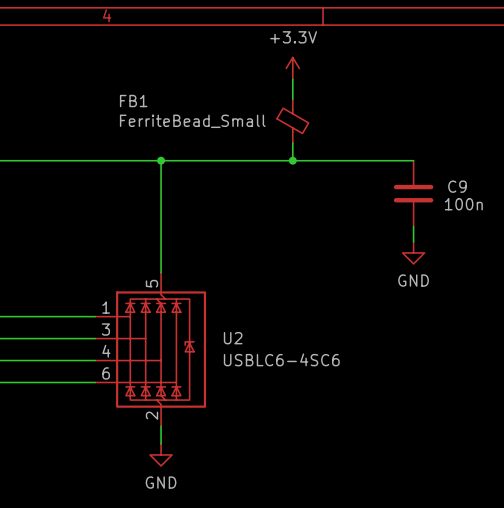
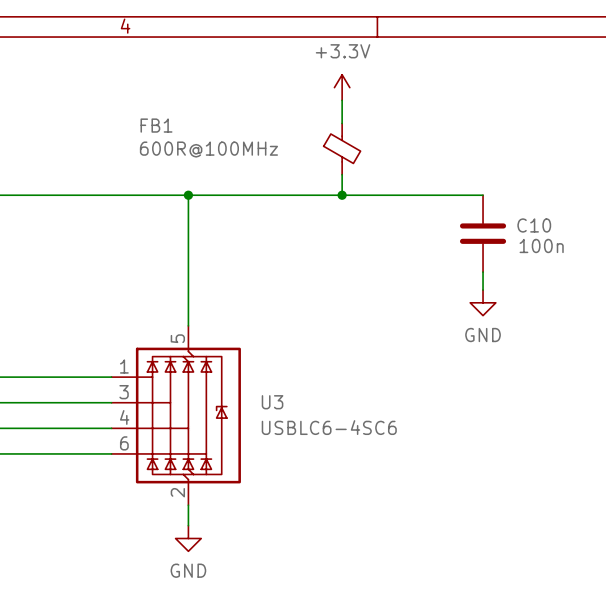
FB1 value: FerriteBead_Small (192, 121) -> 600R@100MHz (208, 149)
C9 name: C9 (457, 186) -> C10 (534, 225)
U2 name: U2 (233, 338) -> U3 (272, 402)

